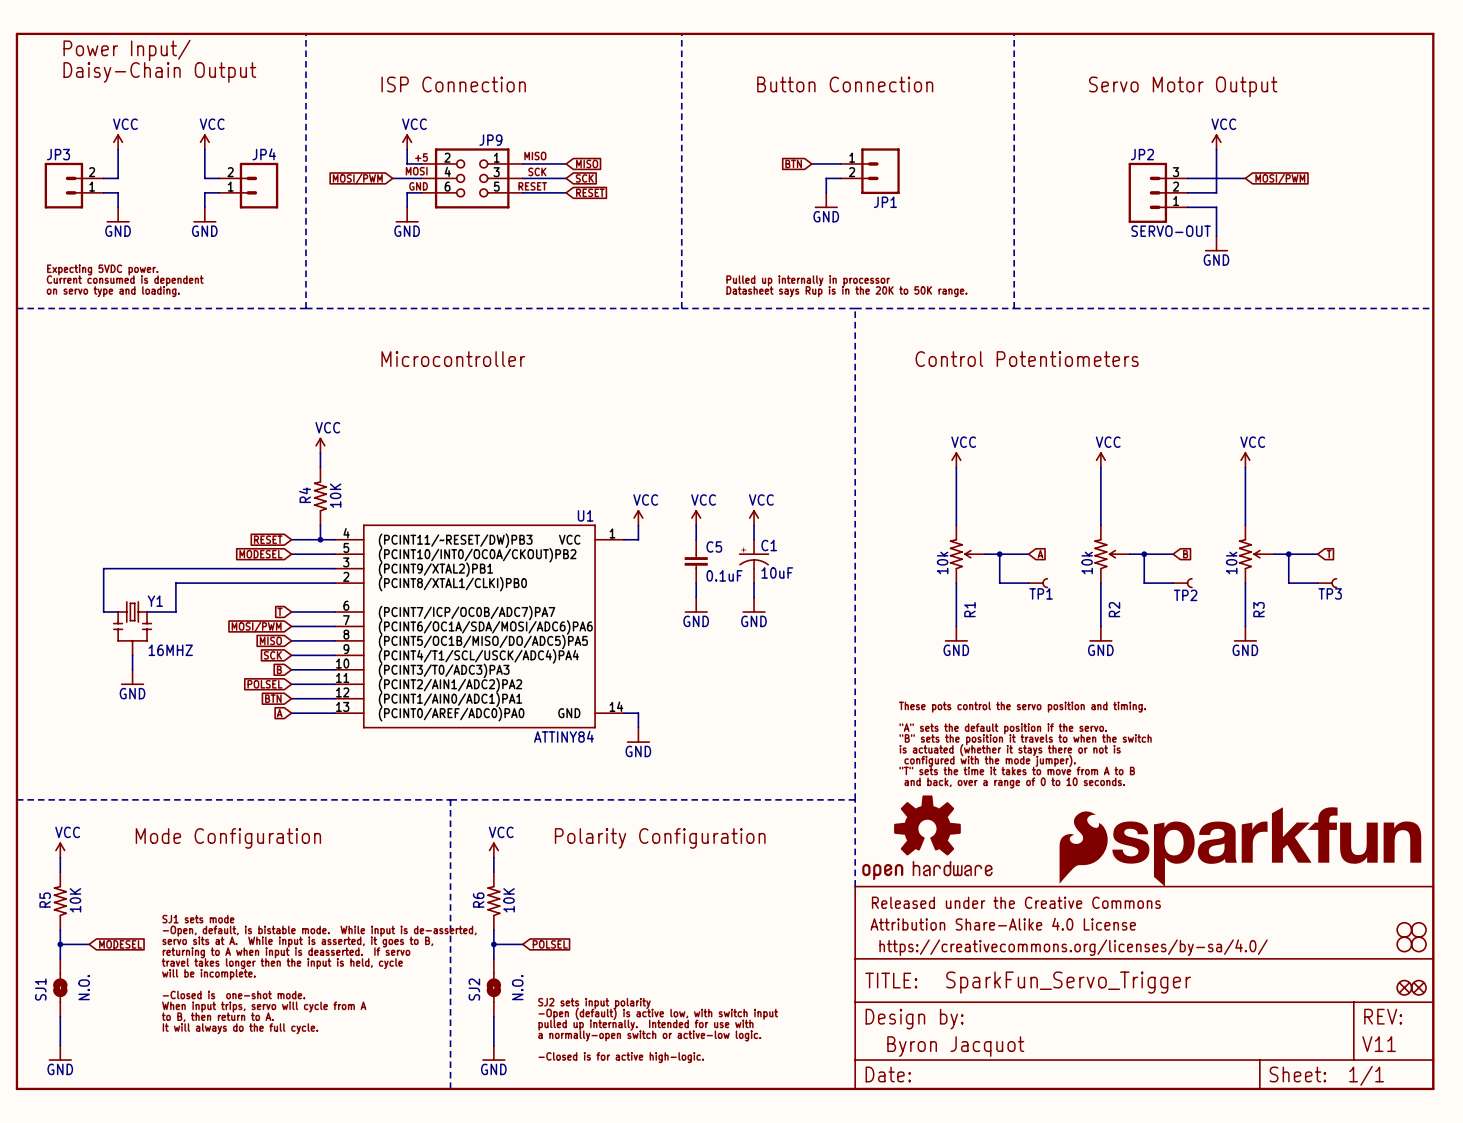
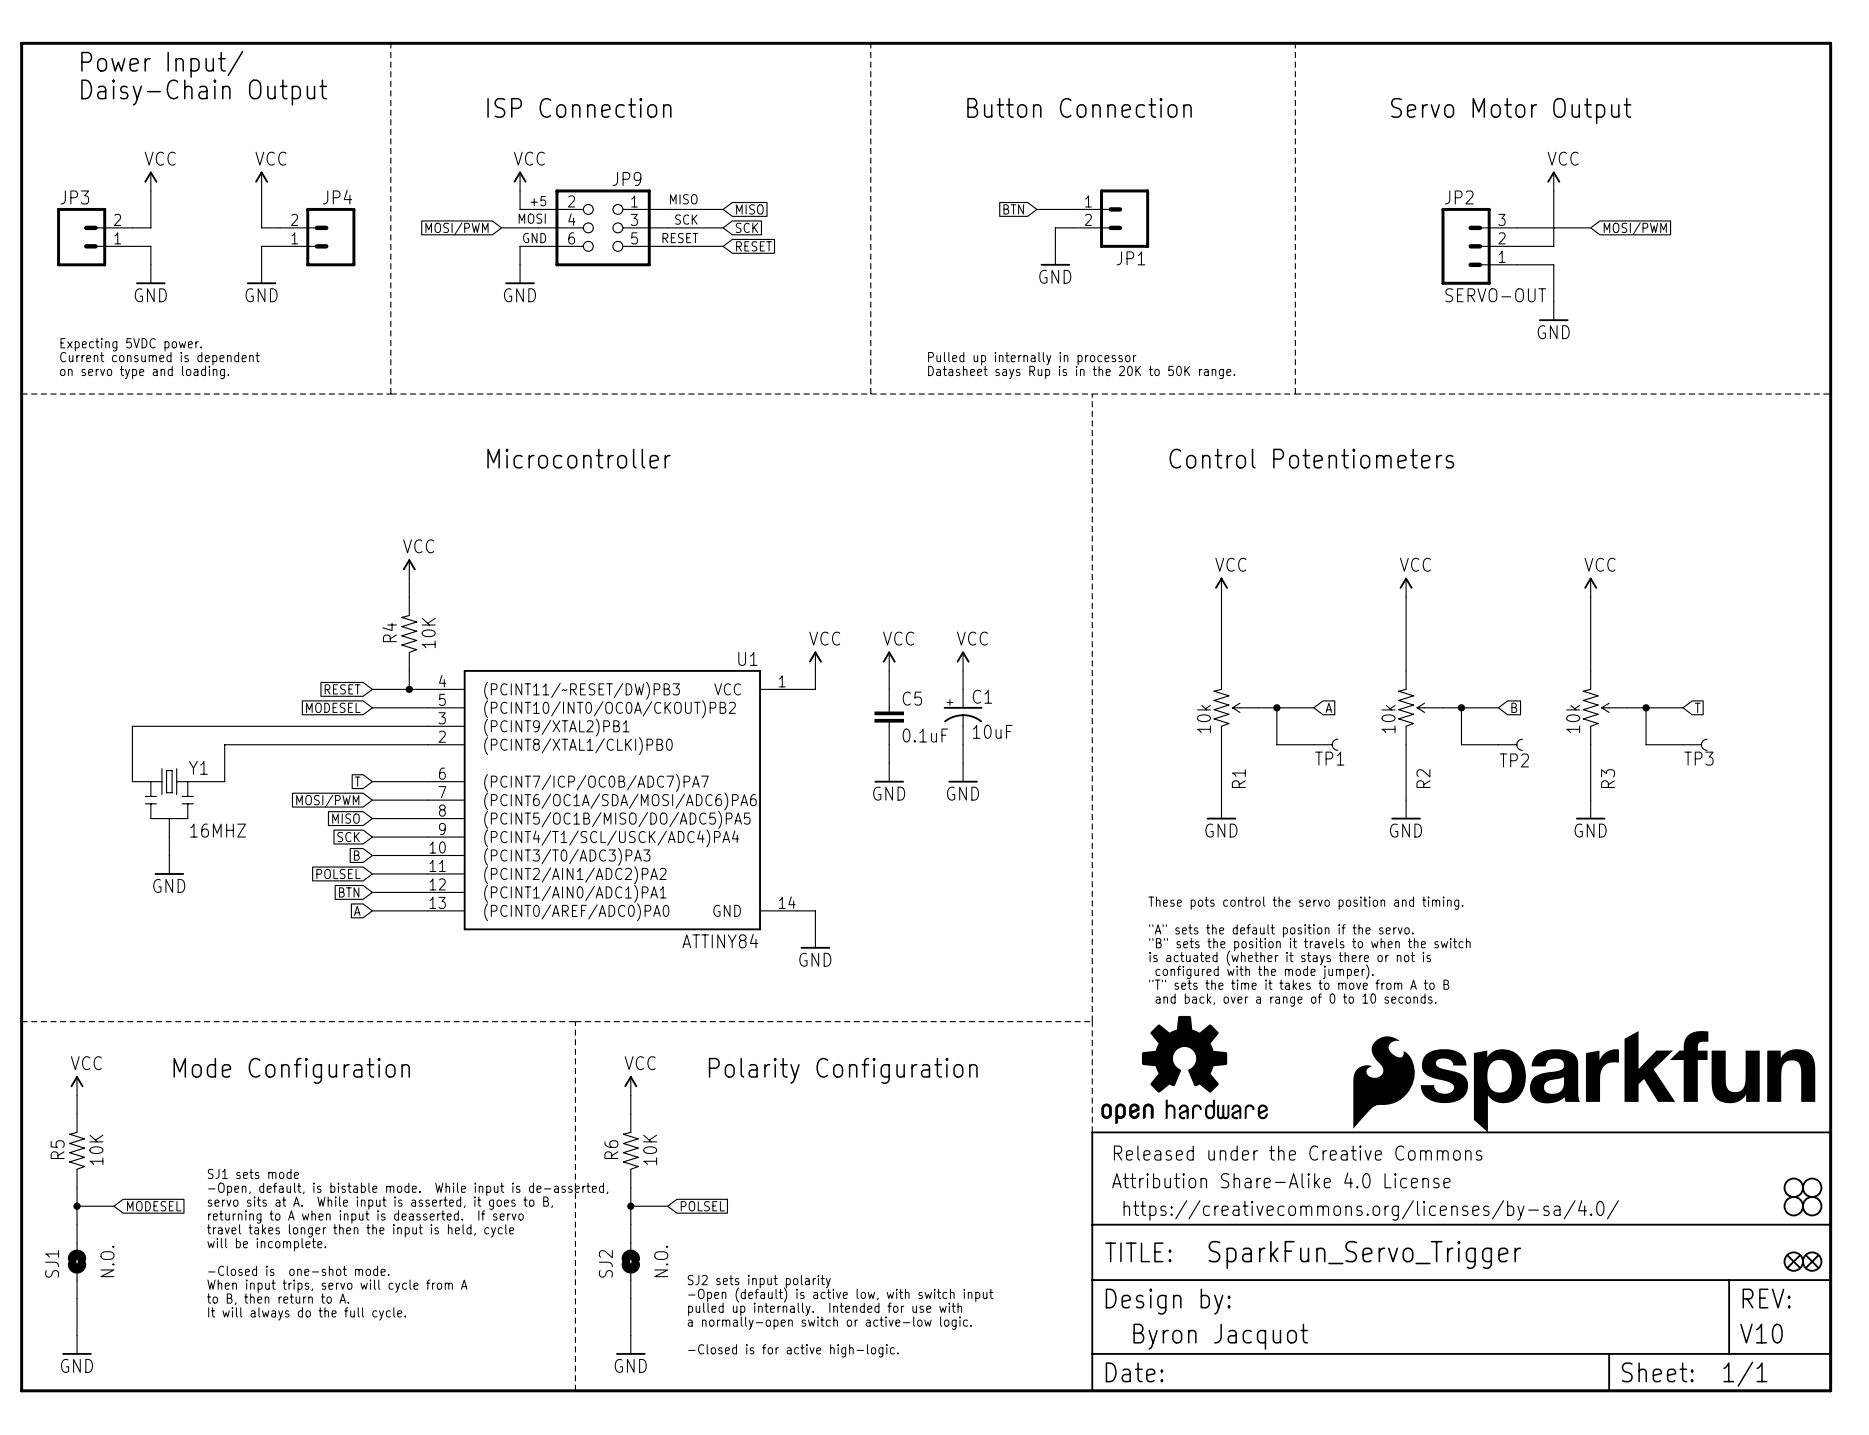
part text: V11 (1379, 1044) -> V10 (1761, 1333)

